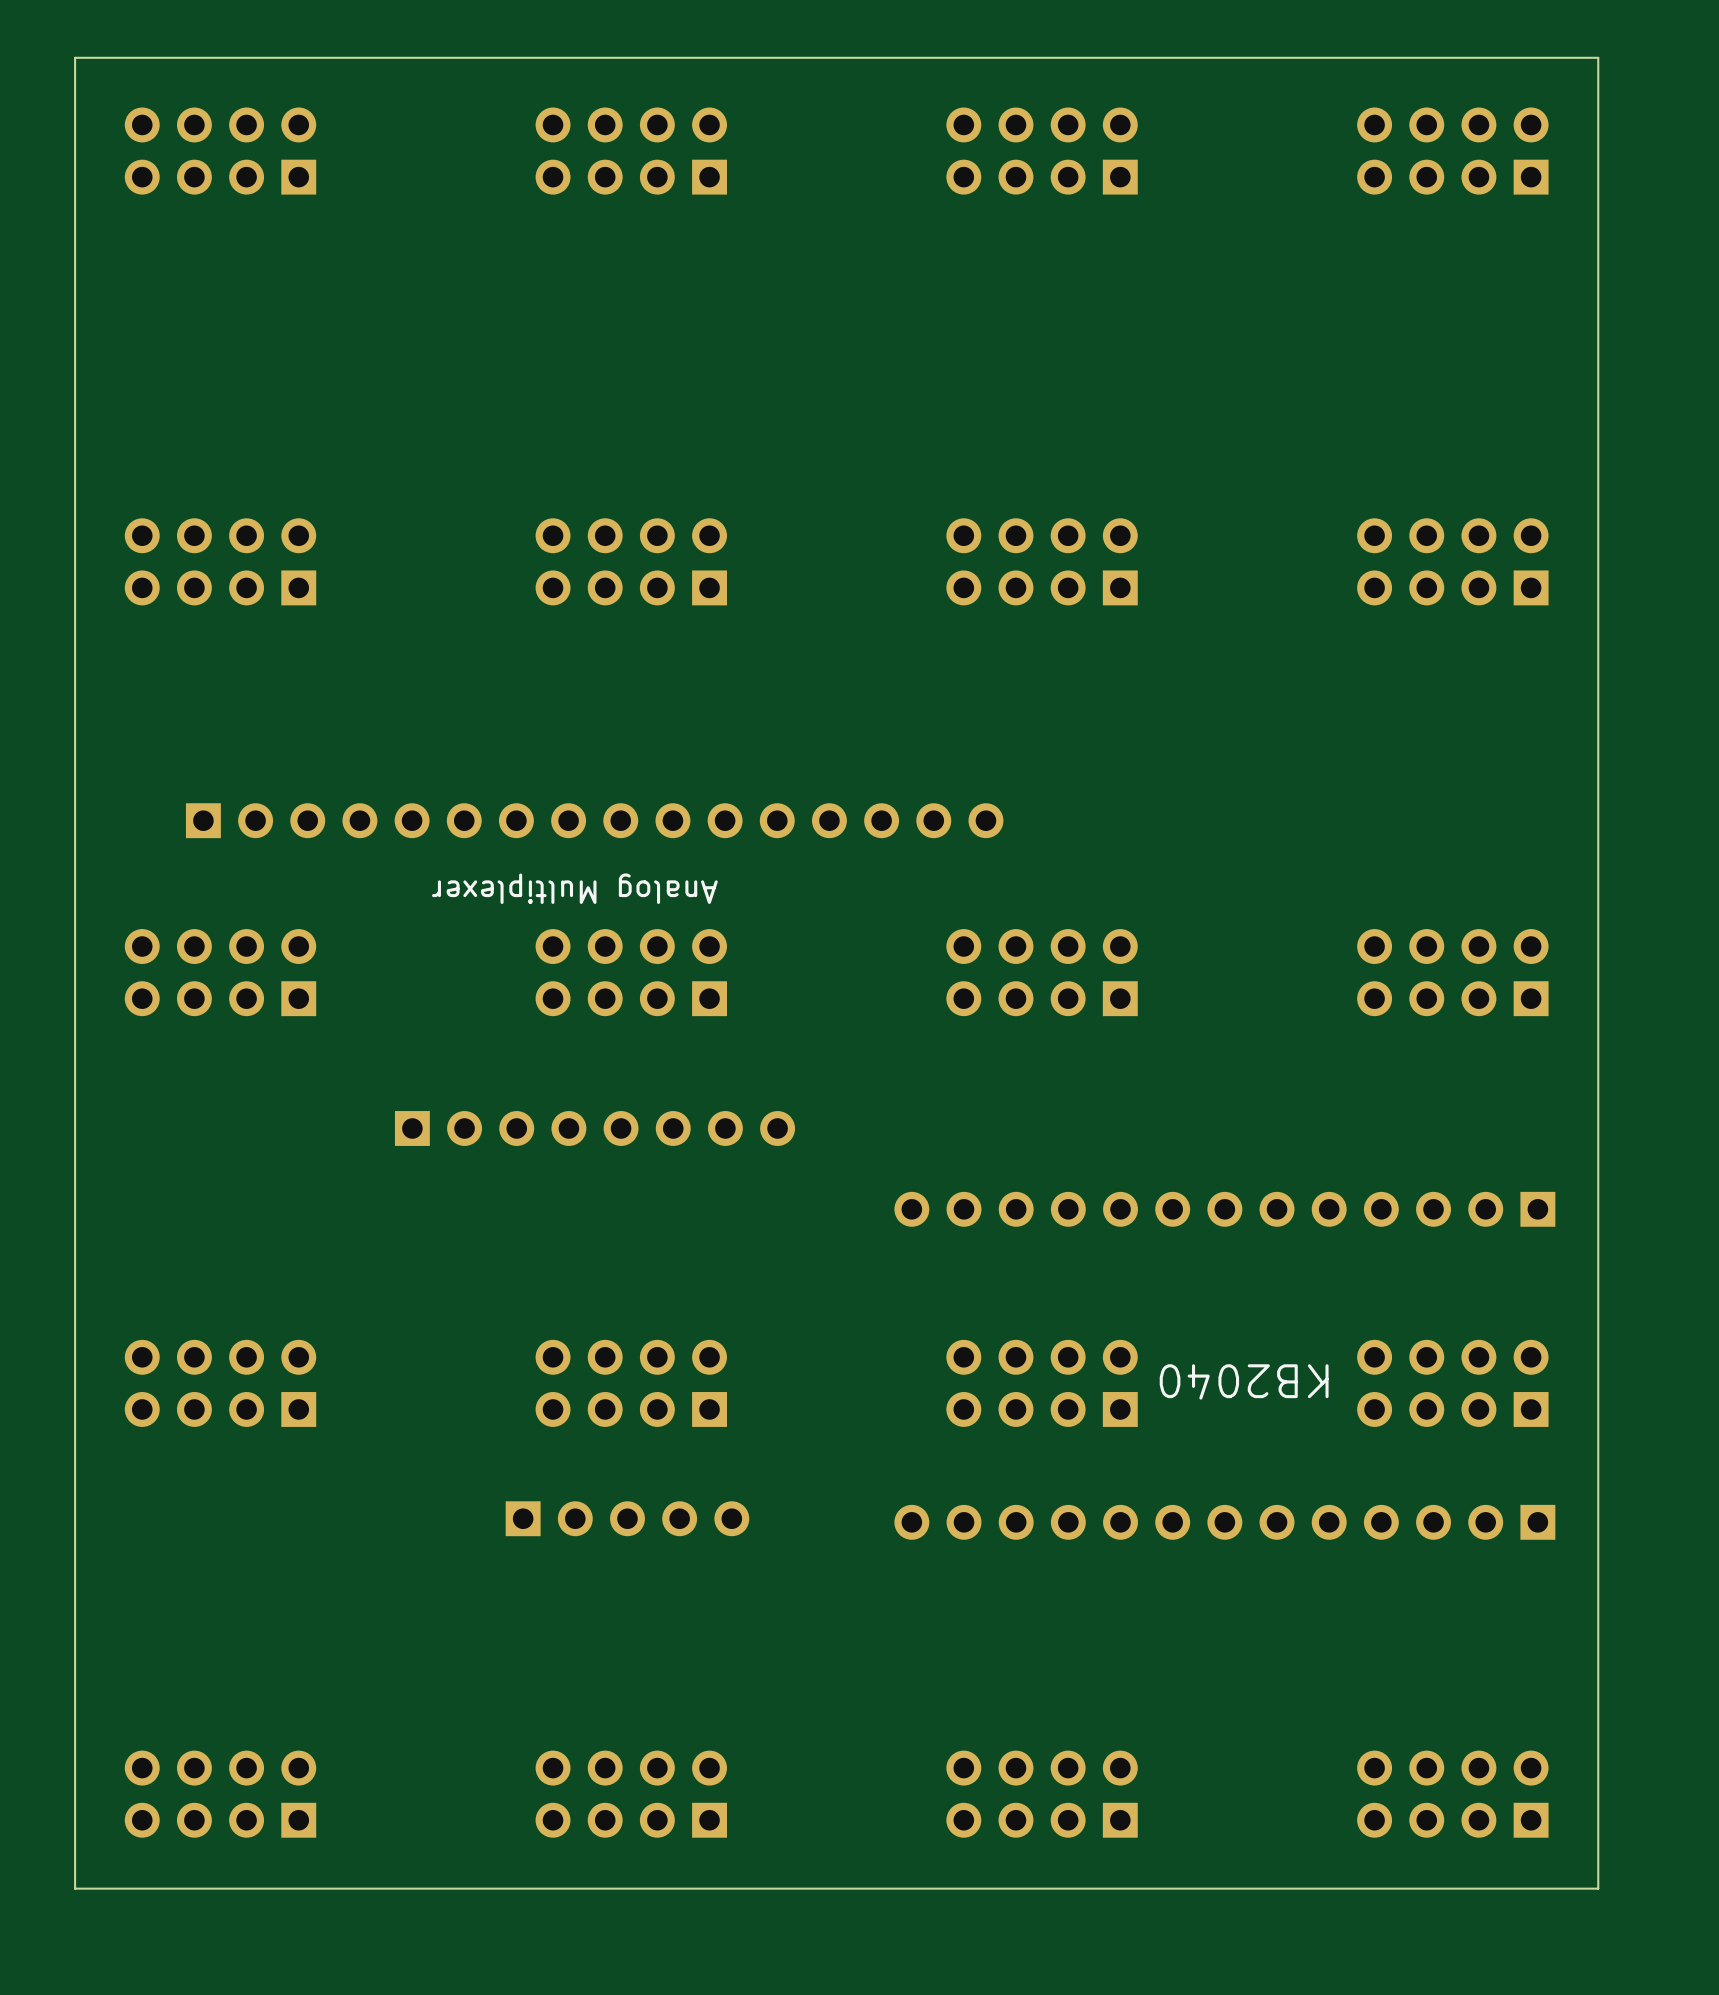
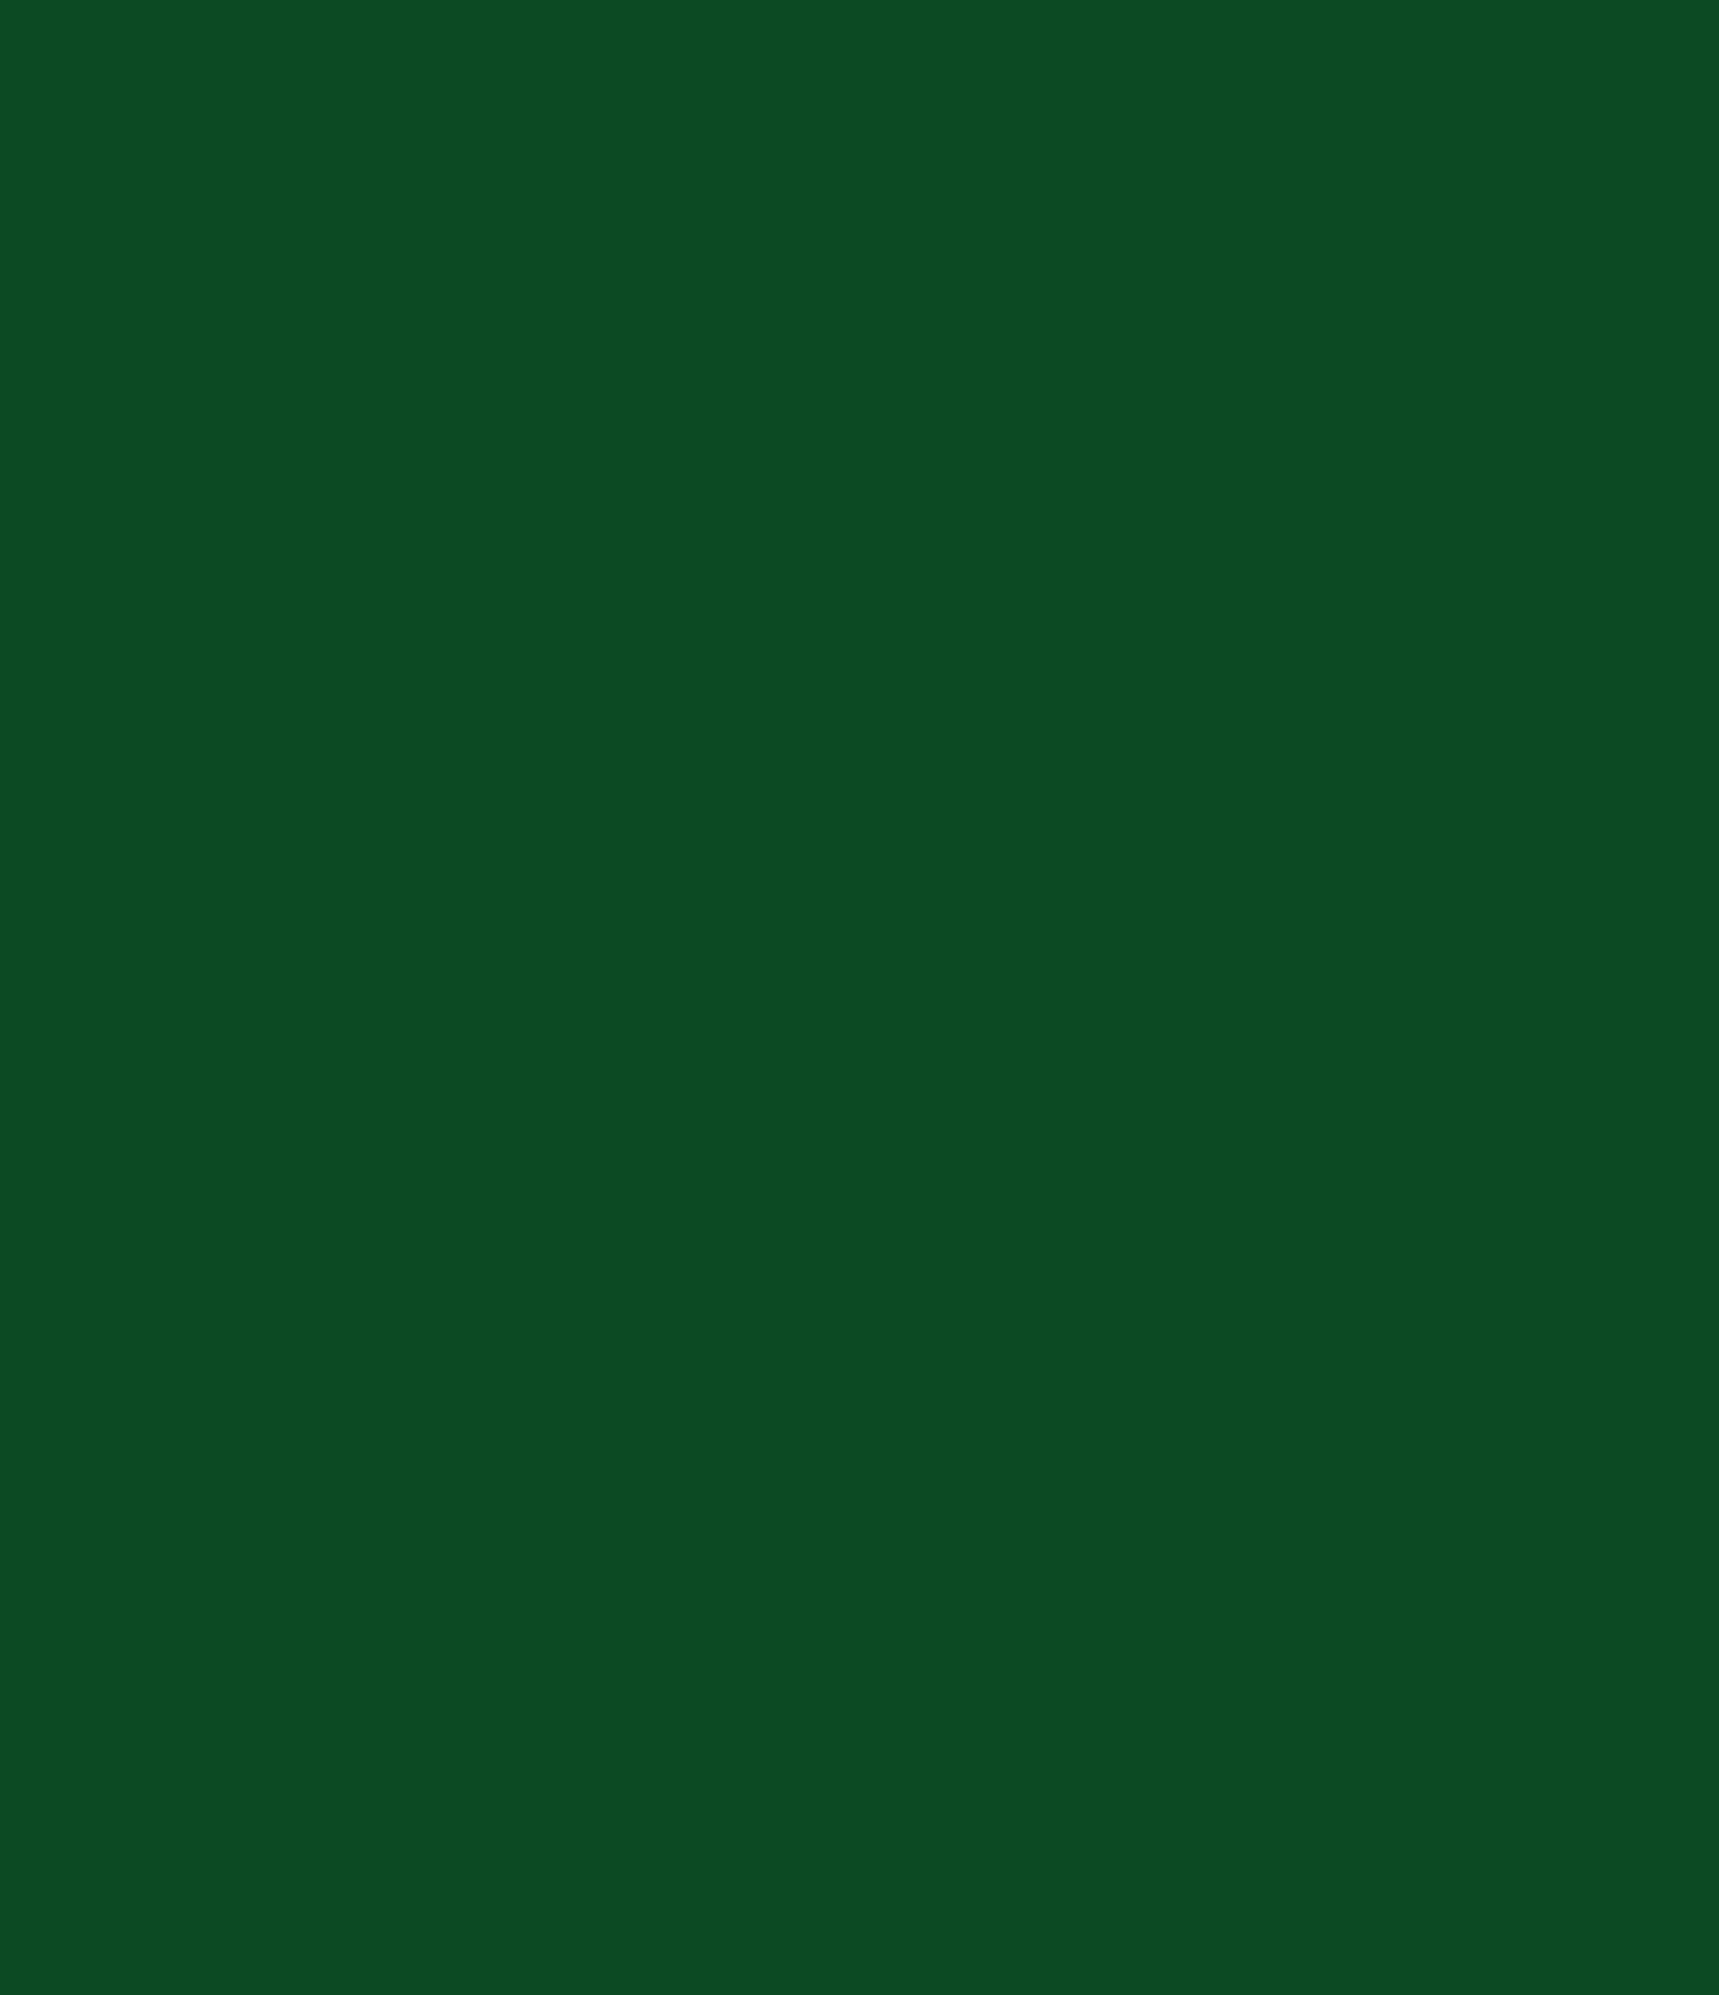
board edge: (1598, 57) (75, 57) (75, 1888) (1598, 1888) (1598, 57) -> none
part: (220, 151) -> none
part: (631, 151) -> none
part: (1042, 151) -> none
part: (1452, 151) -> none
part: (220, 561) -> none
part: (631, 561) -> none
part: (1042, 561) -> none
part: (1452, 561) -> none
part: (594, 820) -> none
text: Analog Multiplexer (574, 888) -> none
part: (220, 972) -> none
part: (631, 972) -> none
part: (1042, 972) -> none
part: (1452, 972) -> none
part: (594, 1128) -> none
part: (1224, 1209) -> none
text: KB2040 (1244, 1381) -> none
part: (220, 1383) -> none
part: (631, 1383) -> none
part: (1042, 1383) -> none
part: (1452, 1383) -> none
part: (627, 1518) -> none
part: (1224, 1522) -> none
part: (220, 1794) -> none
part: (631, 1794) -> none
part: (1042, 1794) -> none
part: (1452, 1794) -> none

